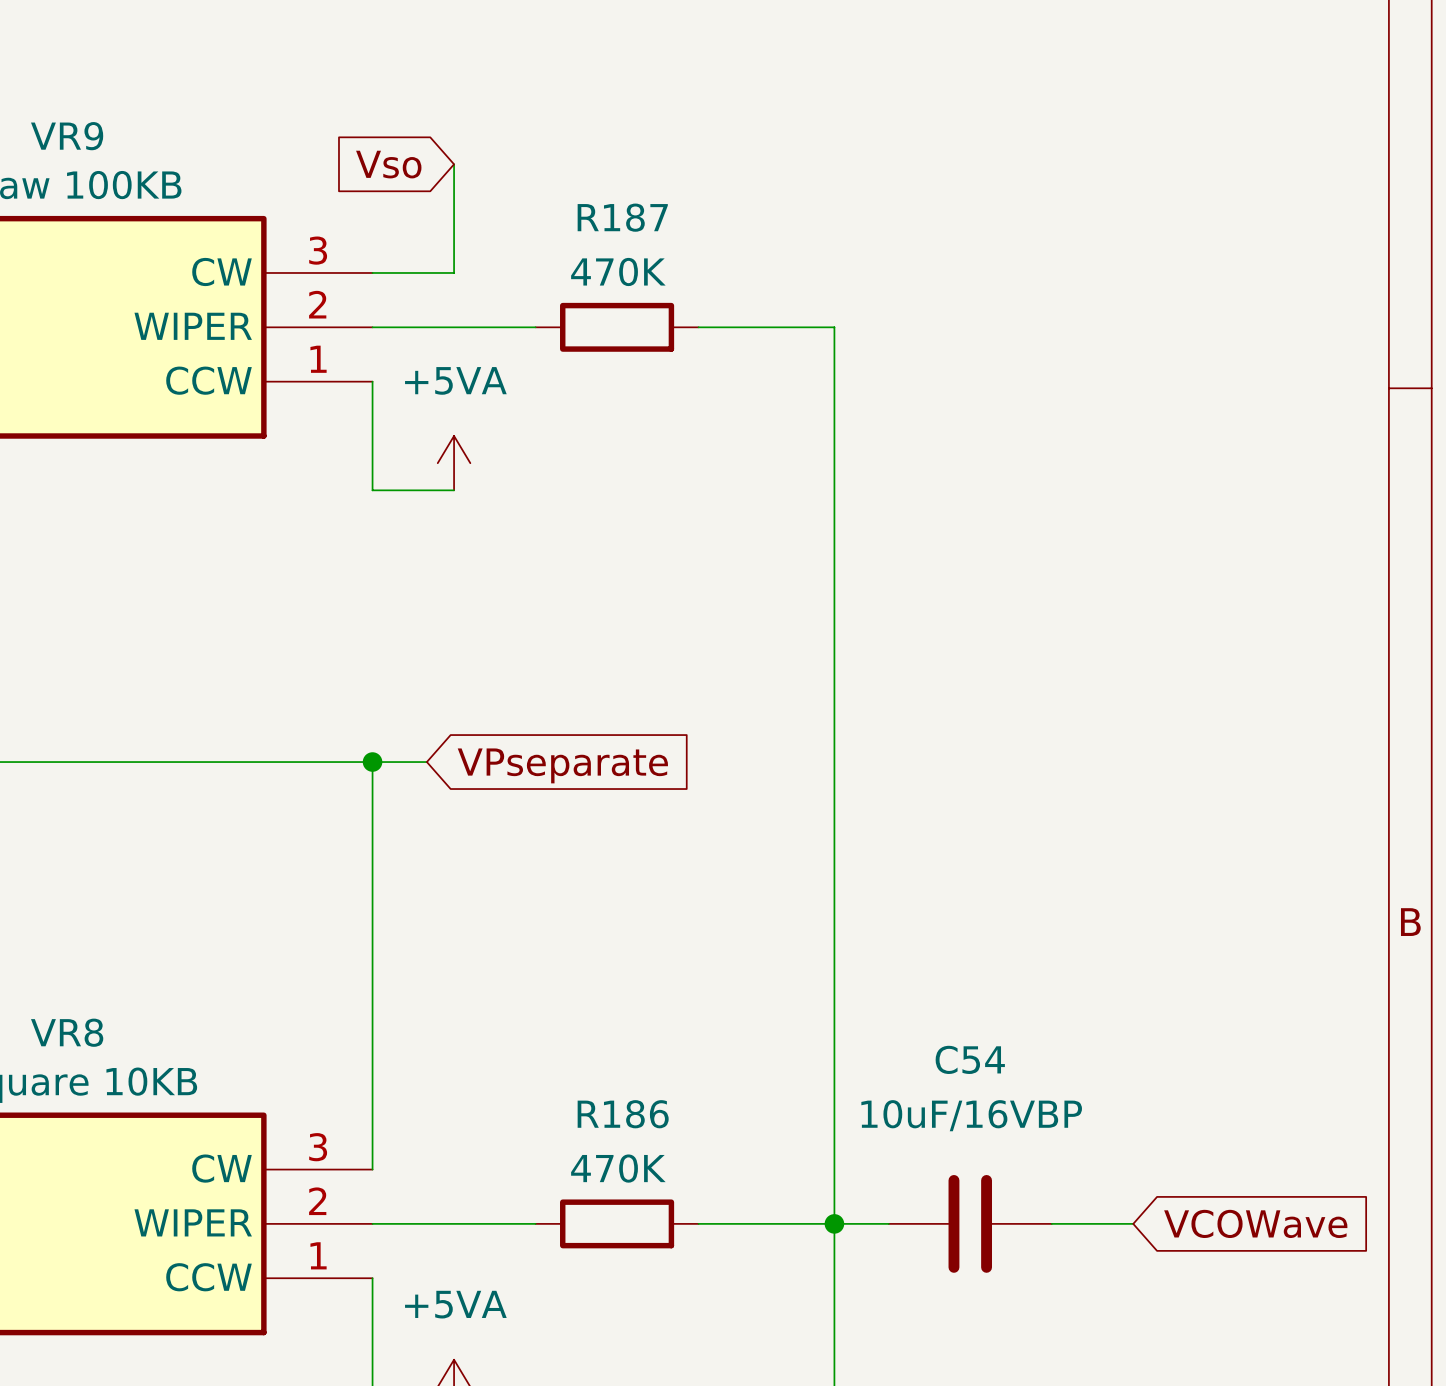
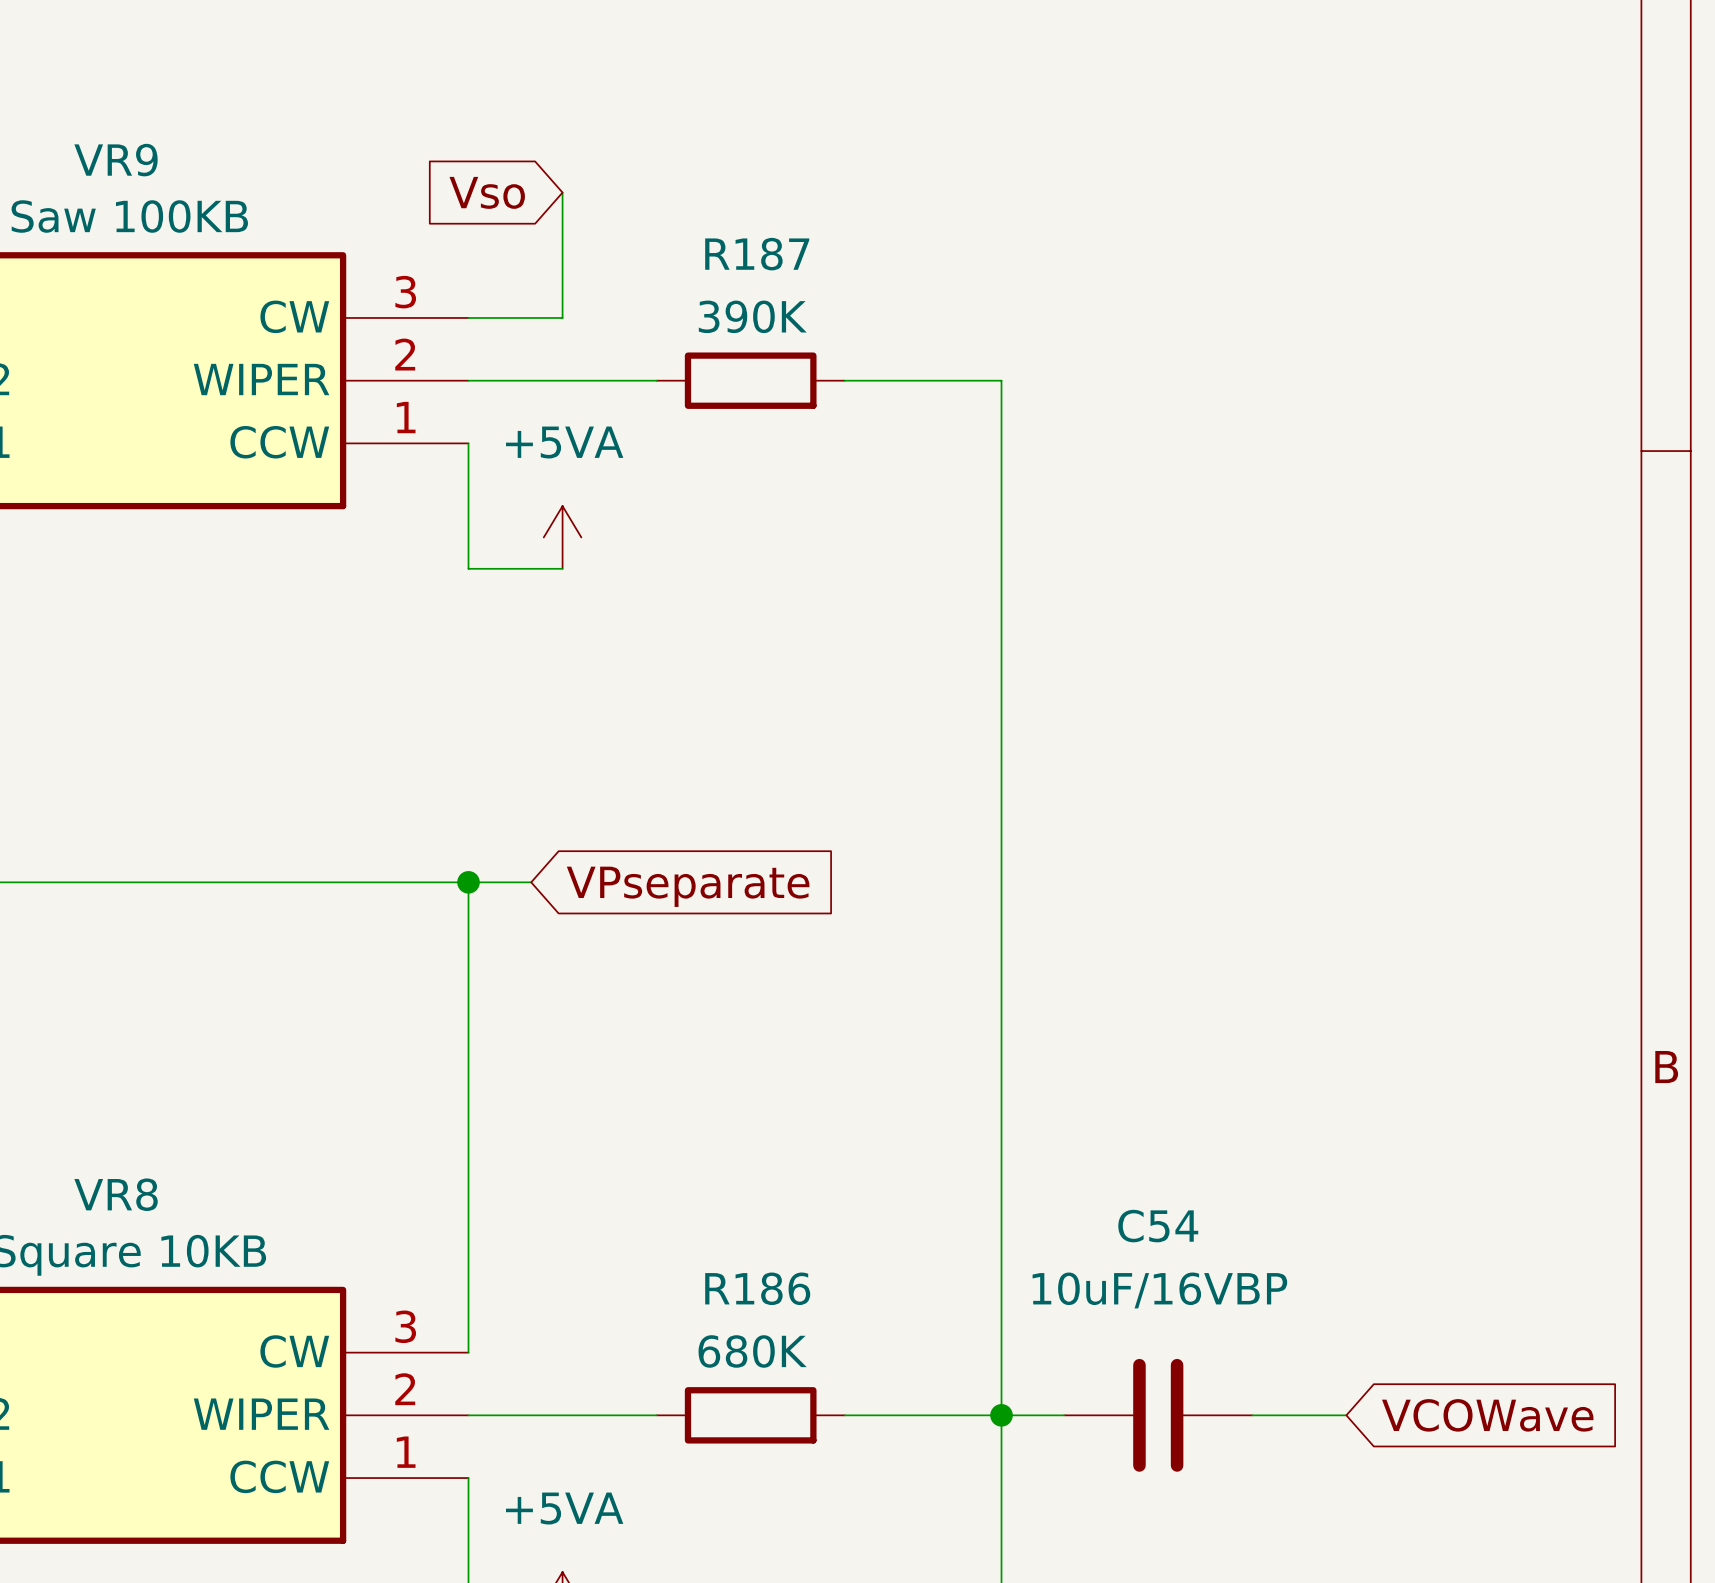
R187 value: 470K (618, 271) -> 390K (752, 316)
R186 value: 470K (618, 1168) -> 680K (752, 1351)

